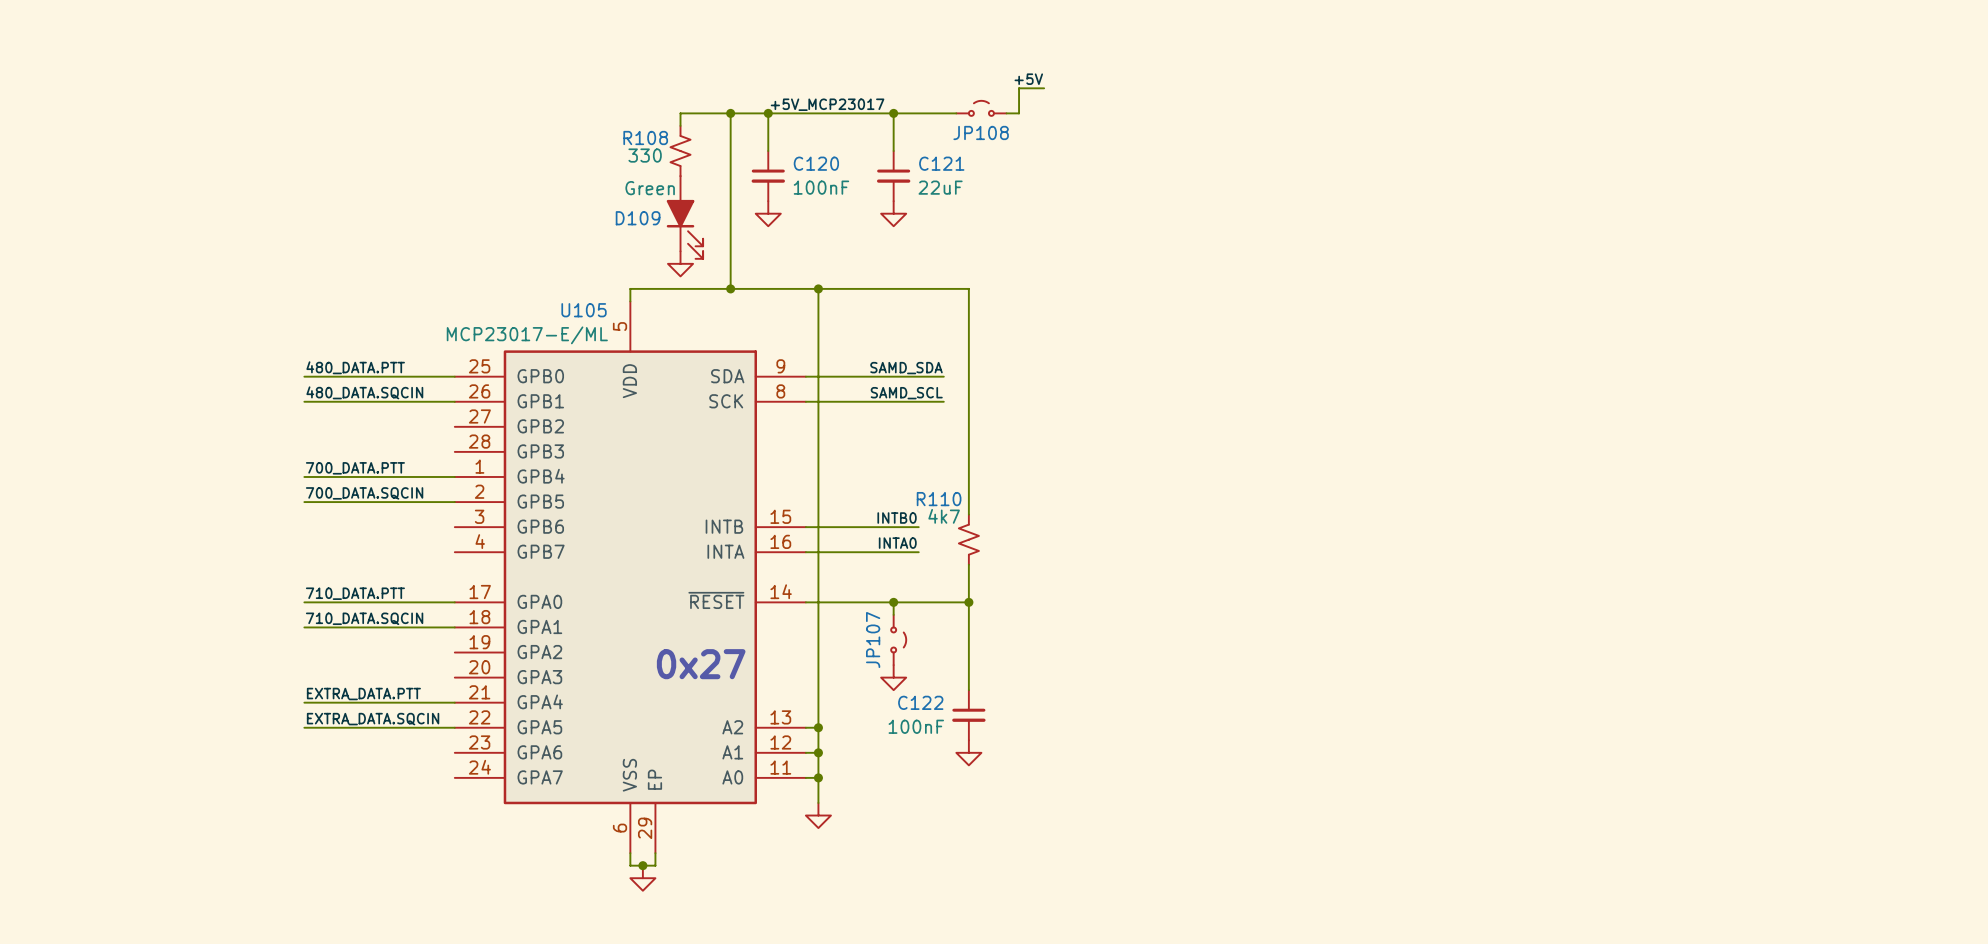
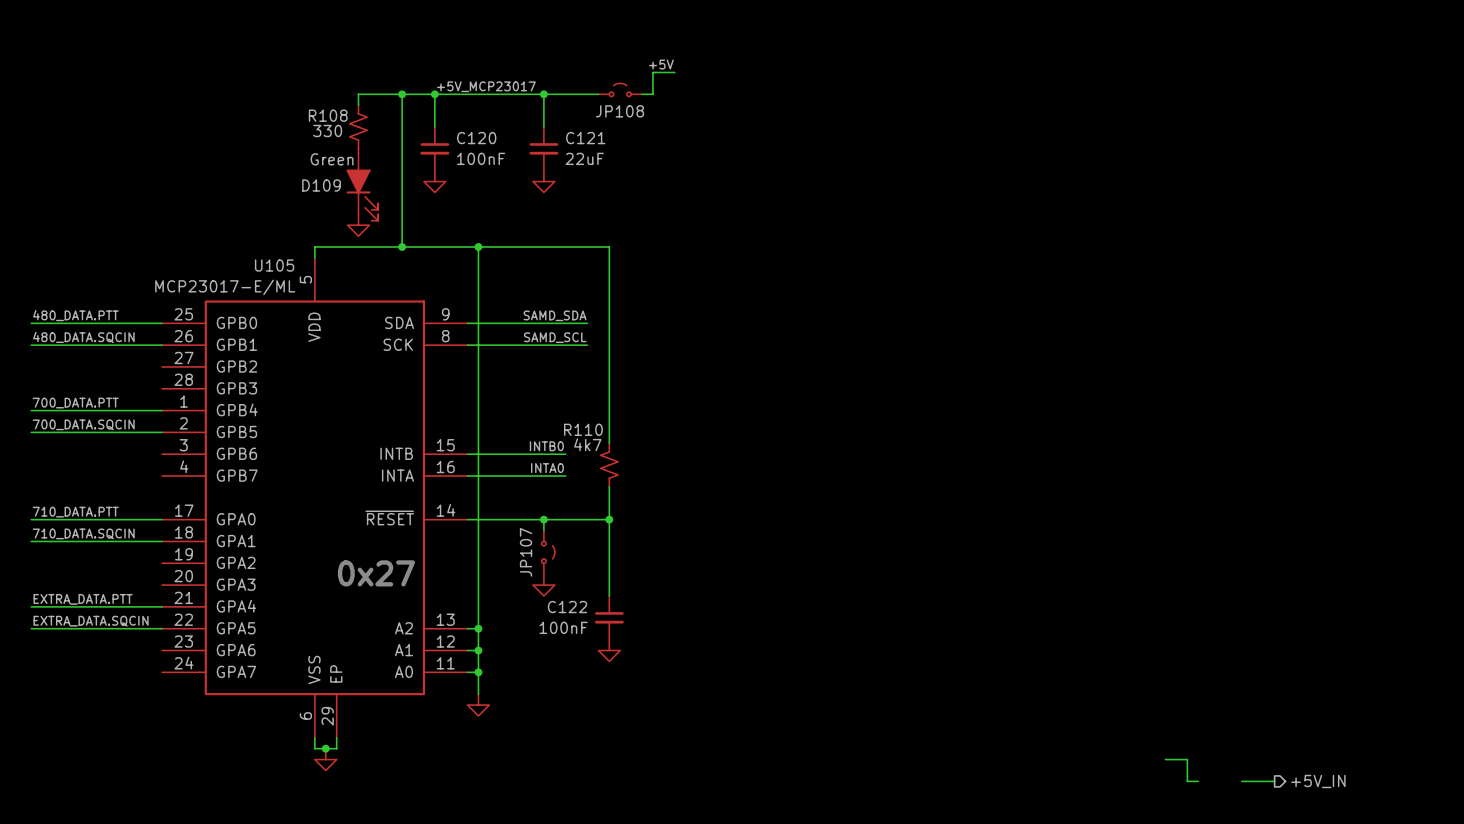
wire: none -> (1165, 759) (1187, 759) (1187, 781) (1198, 781)
wire: none -> (1241, 781) (1274, 781)
sheet pin: none -> +5V_IN (1318, 781)

